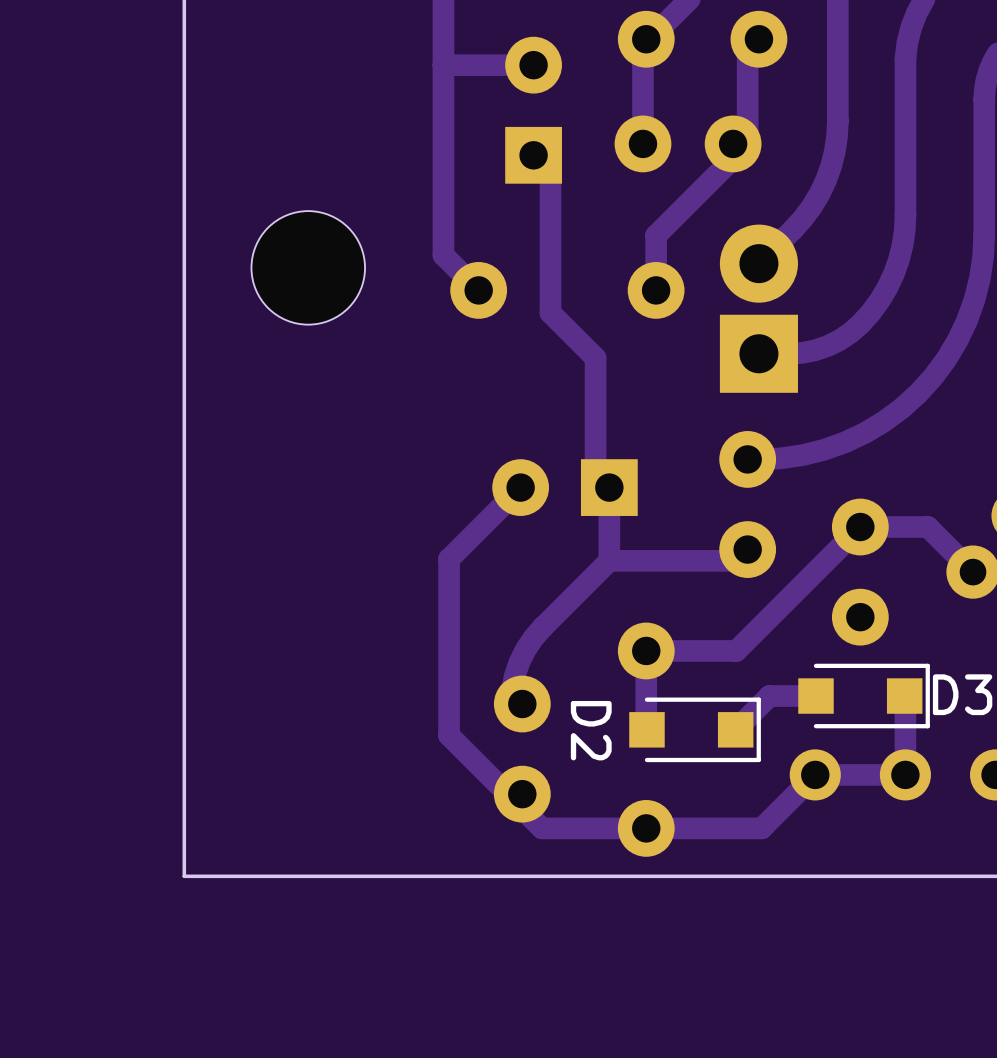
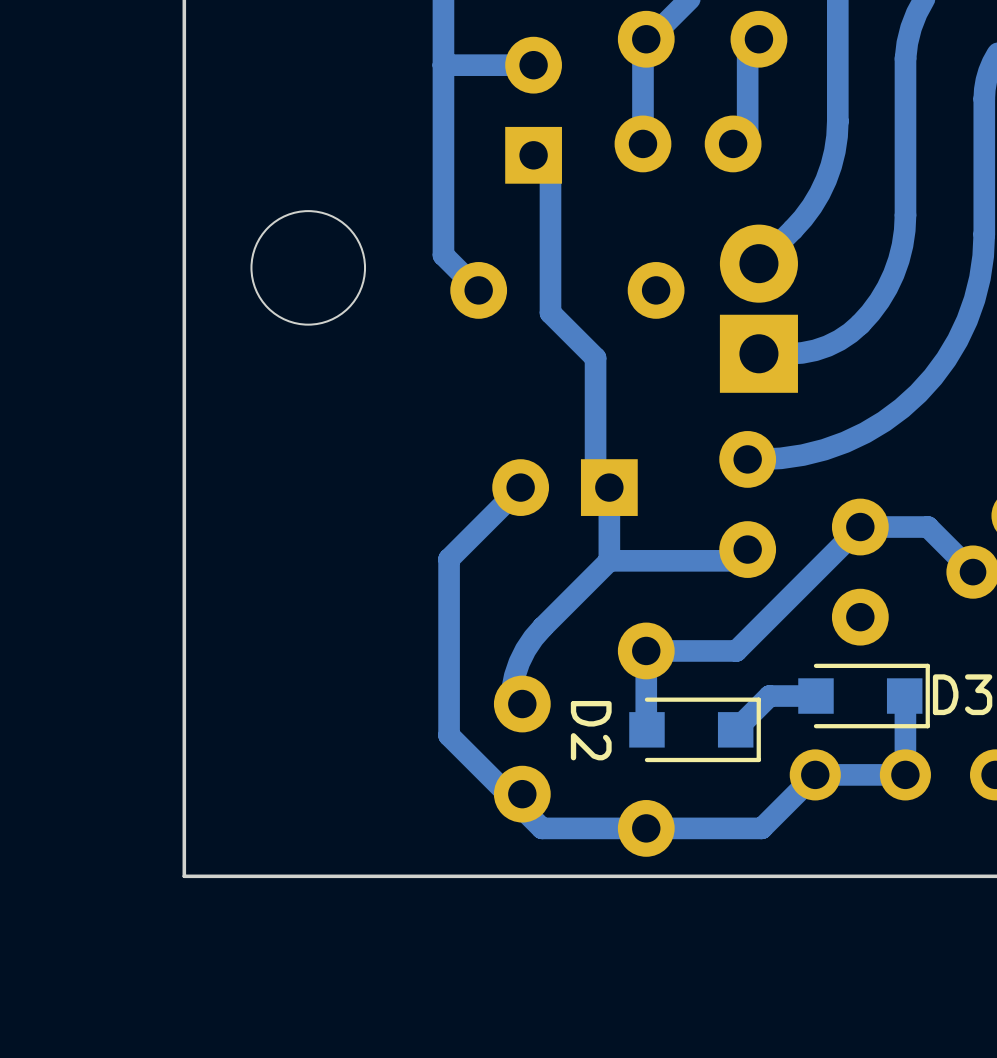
track: (733, 143) (733, 158) (656, 235) (656, 290) -> none

